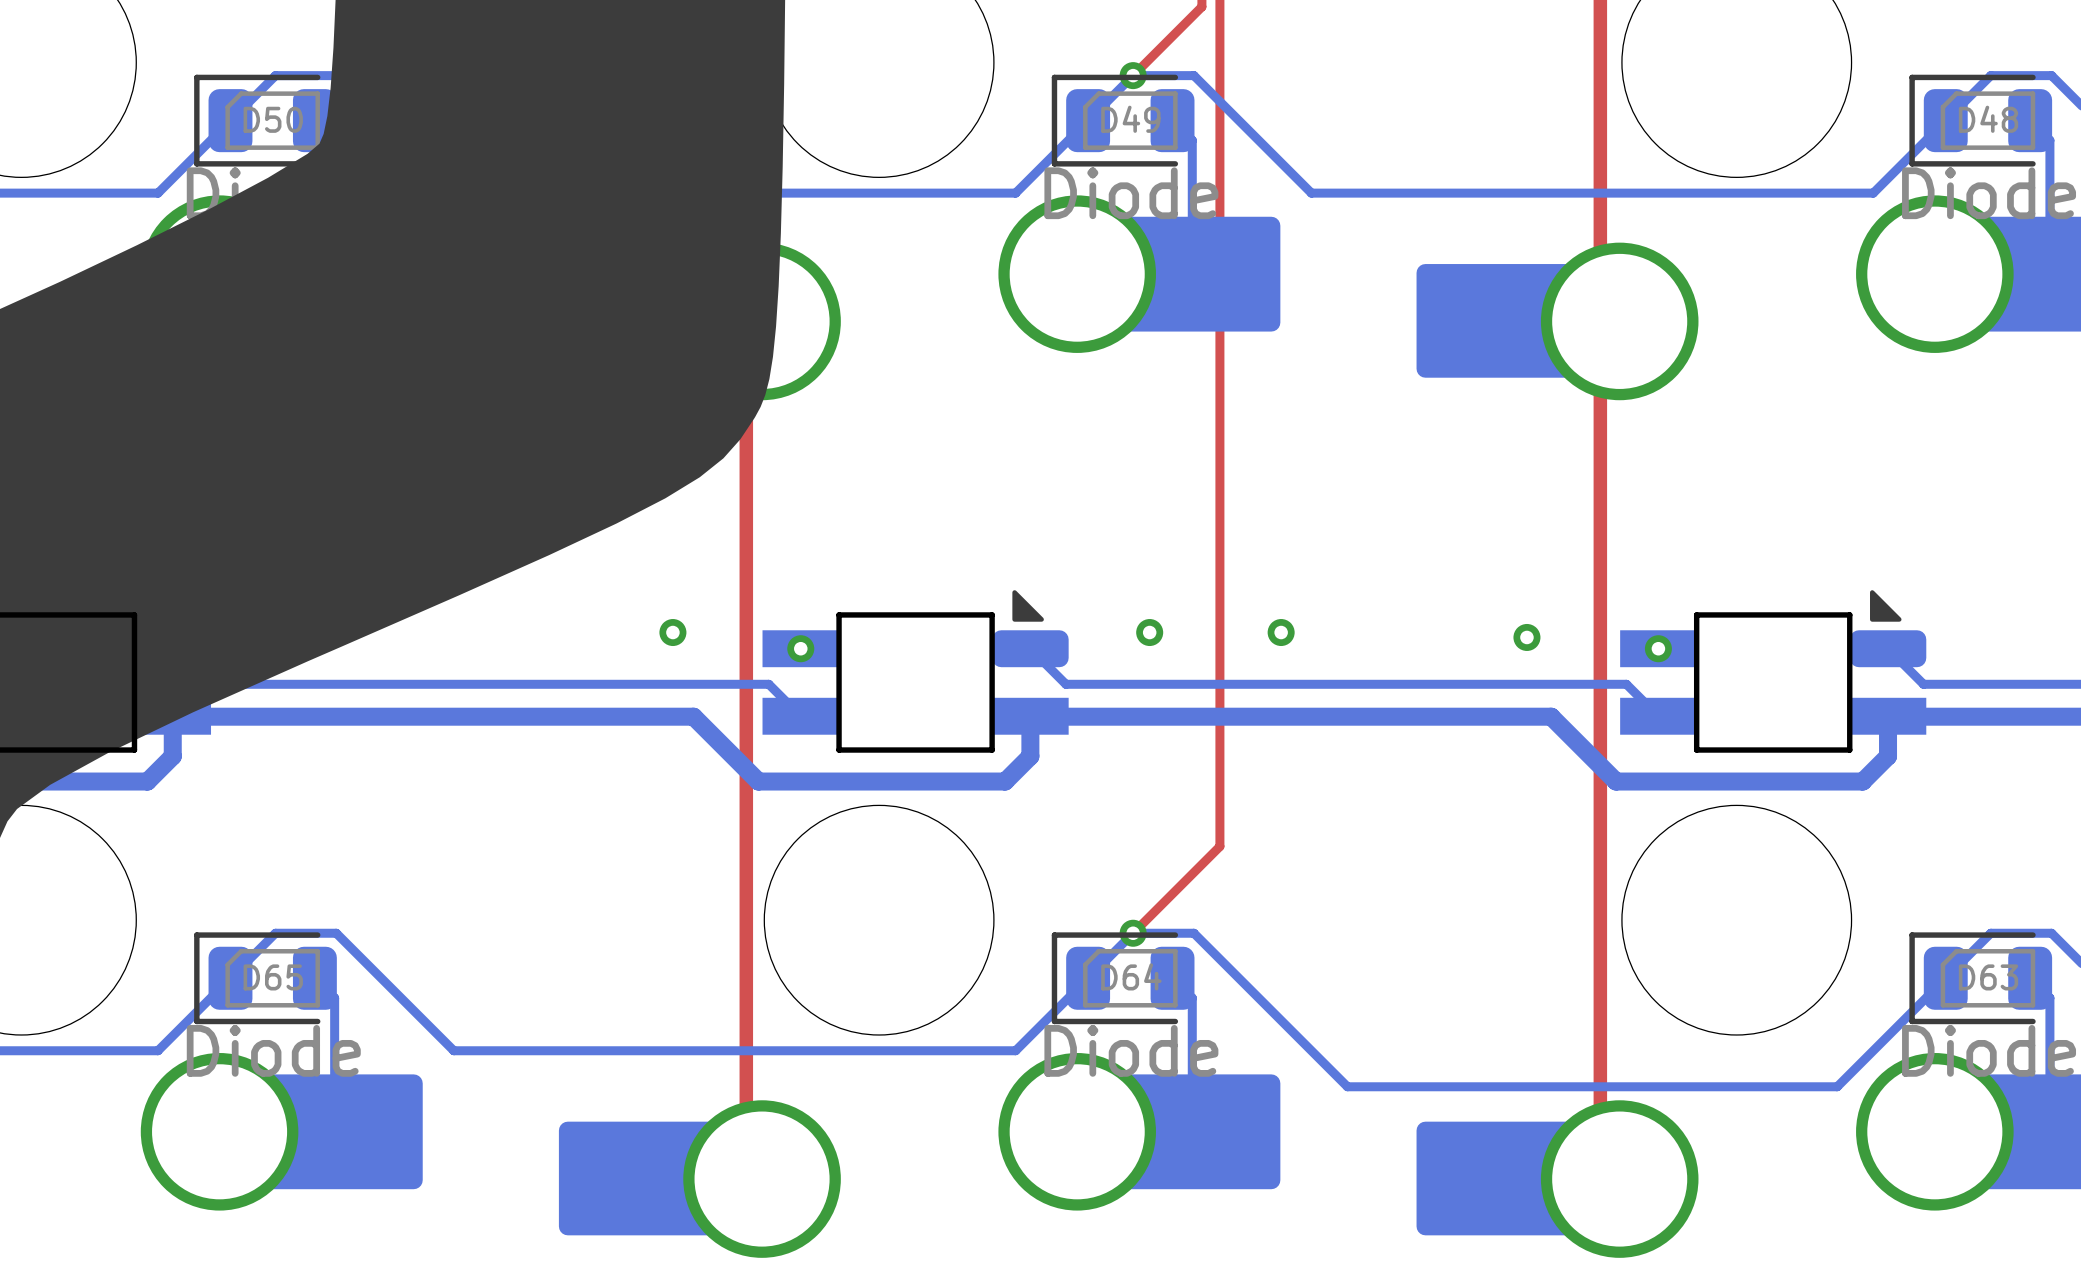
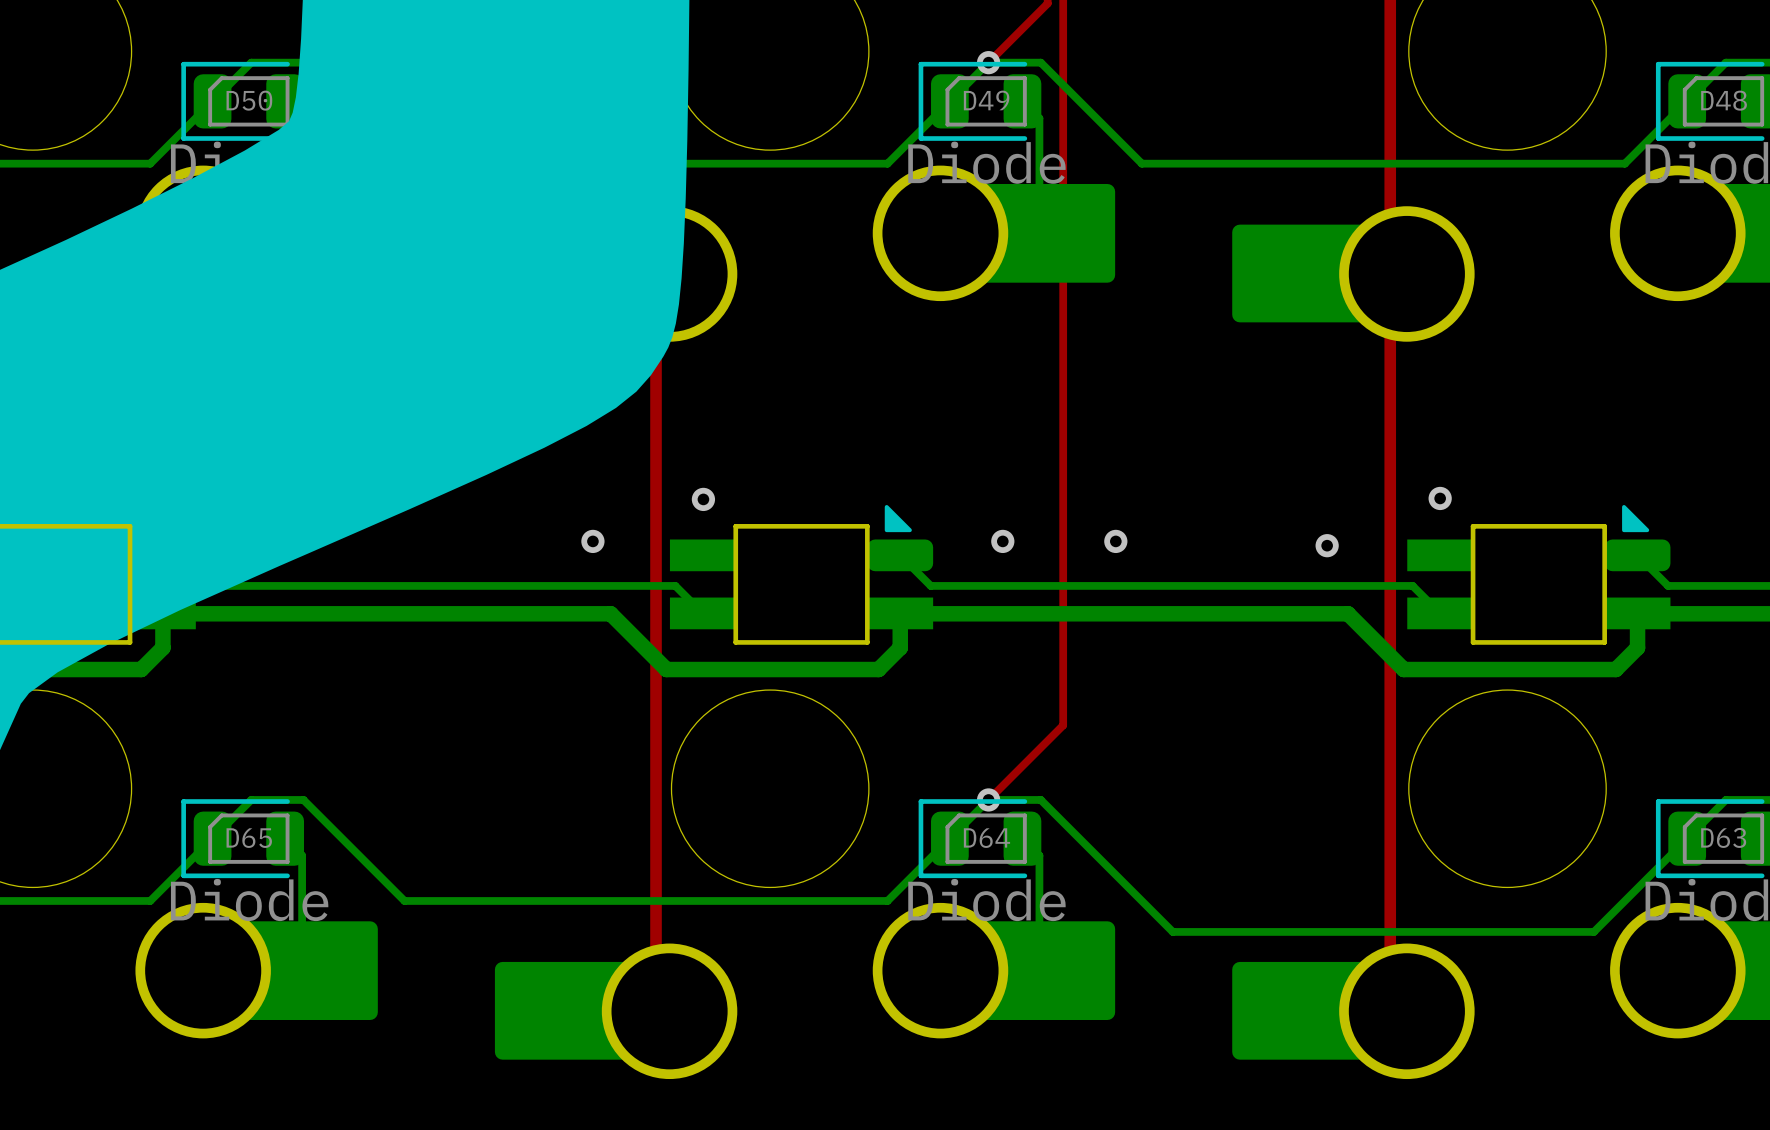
via position: (800, 648) -> (703, 499)
via position: (1658, 648) -> (1440, 498)

